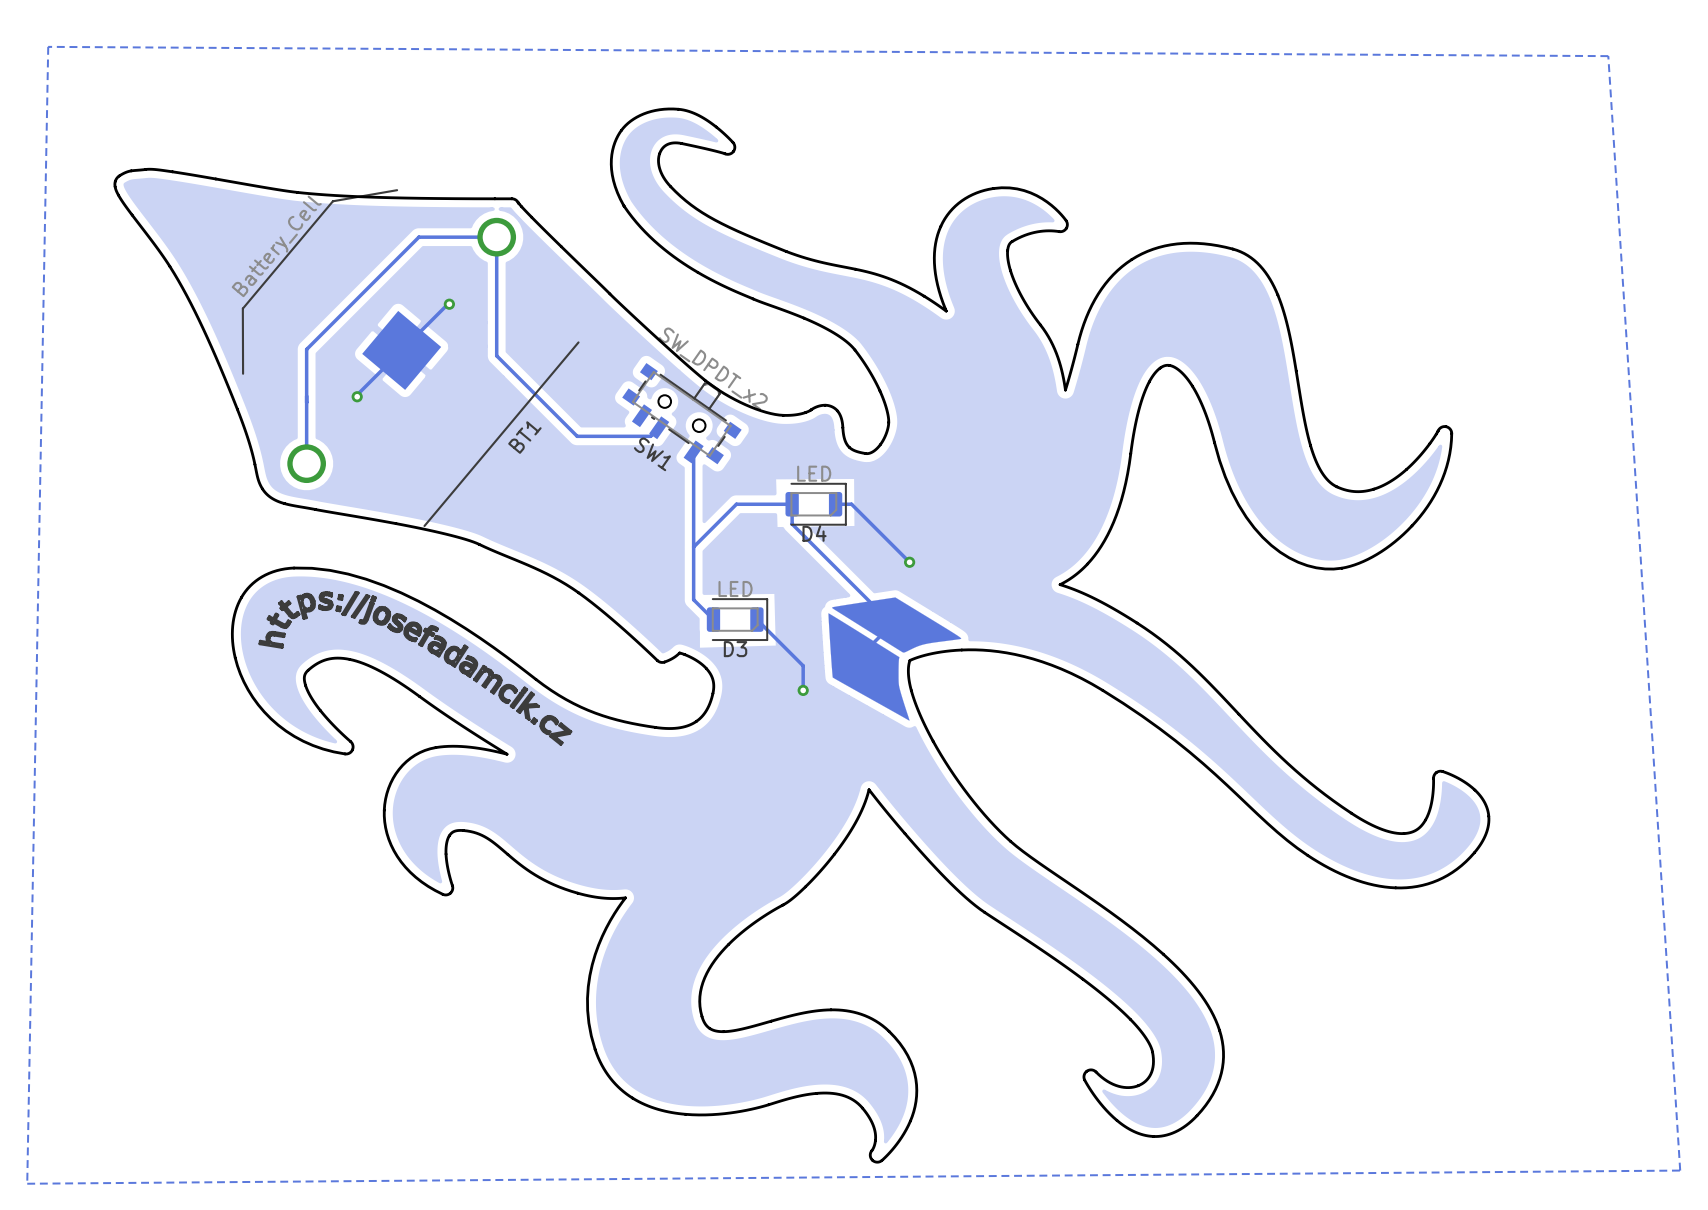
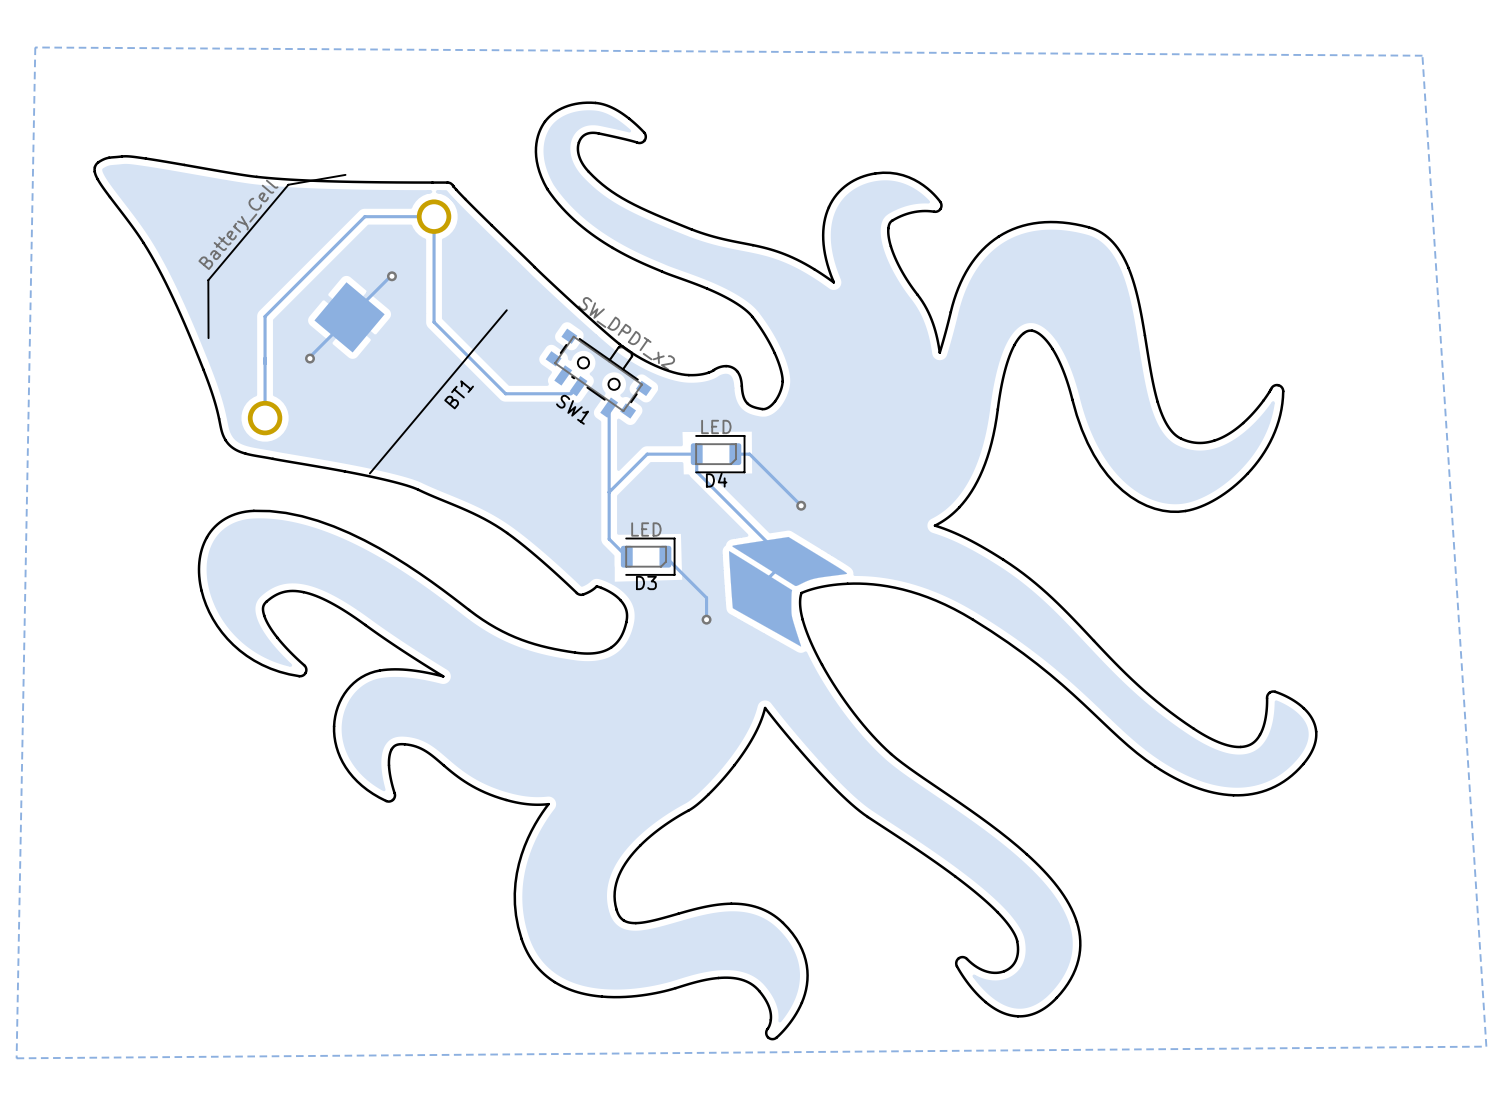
line: (326, 592) (331, 593) (331, 596) (324, 594) (322, 597) (331, 601) (331, 606) (327, 609) (319, 608) (319, 605) (325, 607) (329, 605) (328, 603) (320, 598) (321, 594) (326, 592) -> none
line: (355, 592) (342, 614) (345, 614) (358, 592) (355, 592) -> none
line: (305, 594) (311, 596) (314, 604) (310, 610) (304, 609) (306, 617) (303, 618) (297, 596) (300, 596) (301, 598) (305, 594) -> none
line: (339, 595) (338, 598) (341, 599) (342, 595) (339, 595) -> none
line: (366, 595) (352, 616) (354, 617) (368, 596) (366, 595) -> none
line: (305, 596) (309, 597) (311, 601) (311, 606) (308, 608) (305, 608) (302, 603) (302, 599) (305, 596) -> none
line: (372, 596) (371, 599) (374, 600) (375, 597) (372, 596) -> none
line: (288, 601) (289, 603) (285, 606) (291, 613) (293, 615) (297, 612) (299, 614) (294, 617) (280, 608) (282, 606) (279, 603) (281, 601) (284, 605) (288, 601) -> none
line: (370, 602) (364, 619) (359, 622) (364, 623) (366, 620) (373, 603) (370, 602) -> none
line: (337, 606) (340, 607) (339, 610) (336, 610) (337, 606) -> none
line: (379, 607) (375, 612) (374, 618) (377, 623) (383, 624) (388, 620) (389, 613) (385, 608) (379, 607) -> none
line: (384, 610) (380, 610) (377, 614) (376, 618) (379, 621) (383, 621) (386, 617) (386, 613) (384, 610) -> none
line: (276, 614) (277, 615) (275, 619) (284, 624) (288, 620) (290, 621) (287, 626) (271, 622) (272, 621) (268, 618) (269, 616) (273, 618) (276, 614) -> none
line: (396, 614) (405, 618) (404, 621) (399, 617) (396, 617) (402, 626) (397, 631) (388, 627) (389, 624) (394, 628) (398, 628) (393, 619) (396, 614) -> none
line: (410, 623) (416, 623) (420, 628) (418, 635) (408, 629) (408, 635) (416, 638) (415, 640) (408, 638) (404, 633) (406, 627) (410, 623) -> none
line: (412, 625) (417, 627) (417, 632) (409, 627) (412, 625) -> none
line: (431, 626) (424, 630) (426, 632) (419, 644) (421, 645) (428, 633) (432, 635) (433, 633) (430, 631) (431, 629) (436, 630) (437, 628) (431, 626) -> none
line: (274, 632) (284, 634) (283, 636) (271, 635) (269, 640) (282, 644) (282, 647) (259, 643) (260, 641) (269, 642) (267, 634) (274, 632) -> none
line: (434, 644) (431, 647) (433, 650) (437, 650) (440, 647) (434, 644) -> none
line: (442, 645) (441, 641) (435, 638) (436, 636) (444, 640) (443, 648) (438, 656) (436, 654) (437, 652) (432, 652) (428, 648) (432, 642) (442, 645) -> none
line: (464, 645) (467, 647) (454, 666) (452, 664) (453, 662) (446, 661) (445, 655) (449, 648) (455, 647) (460, 653) (464, 645) -> none
line: (452, 649) (456, 650) (458, 654) (455, 659) (451, 661) (447, 656) (452, 649) -> none
line: (465, 664) (462, 667) (465, 670) (468, 671) (472, 668) (465, 664) -> none
line: (473, 666) (473, 661) (466, 658) (468, 656) (476, 661) (475, 668) (469, 676) (467, 674) (469, 672) (463, 672) (460, 668) (464, 662) (473, 666) -> none
line: (483, 666) (485, 667) (484, 669) (491, 671) (492, 676) (497, 675) (500, 678) (500, 683) (493, 693) (491, 691) (498, 681) (497, 678) (491, 678) (485, 687) (482, 685) (489, 675) (488, 671) (483, 671) (476, 681) (474, 679) (483, 666) -> none
line: (507, 685) (502, 688) (499, 694) (501, 699) (507, 702) (509, 700) (502, 696) (504, 690) (509, 687) (515, 692) (516, 690) (512, 686) (507, 685) -> none
line: (524, 687) (526, 689) (524, 692) (522, 690) (524, 687) -> none
line: (520, 692) (522, 694) (513, 707) (511, 706) (520, 692) -> none
line: (531, 692) (517, 710) (519, 712) (524, 706) (526, 717) (529, 719) (527, 707) (538, 706) (535, 704) (525, 705) (533, 694) (531, 692) -> none
line: (548, 716) (543, 719) (540, 725) (542, 730) (548, 733) (550, 731) (543, 727) (545, 721) (550, 718) (556, 723) (557, 722) (553, 717) (548, 716) -> none
line: (534, 718) (531, 721) (534, 723) (536, 720) (534, 718) -> none
line: (561, 723) (559, 725) (567, 731) (550, 736) (560, 744) (562, 742) (554, 736) (570, 731) (561, 723) -> none

